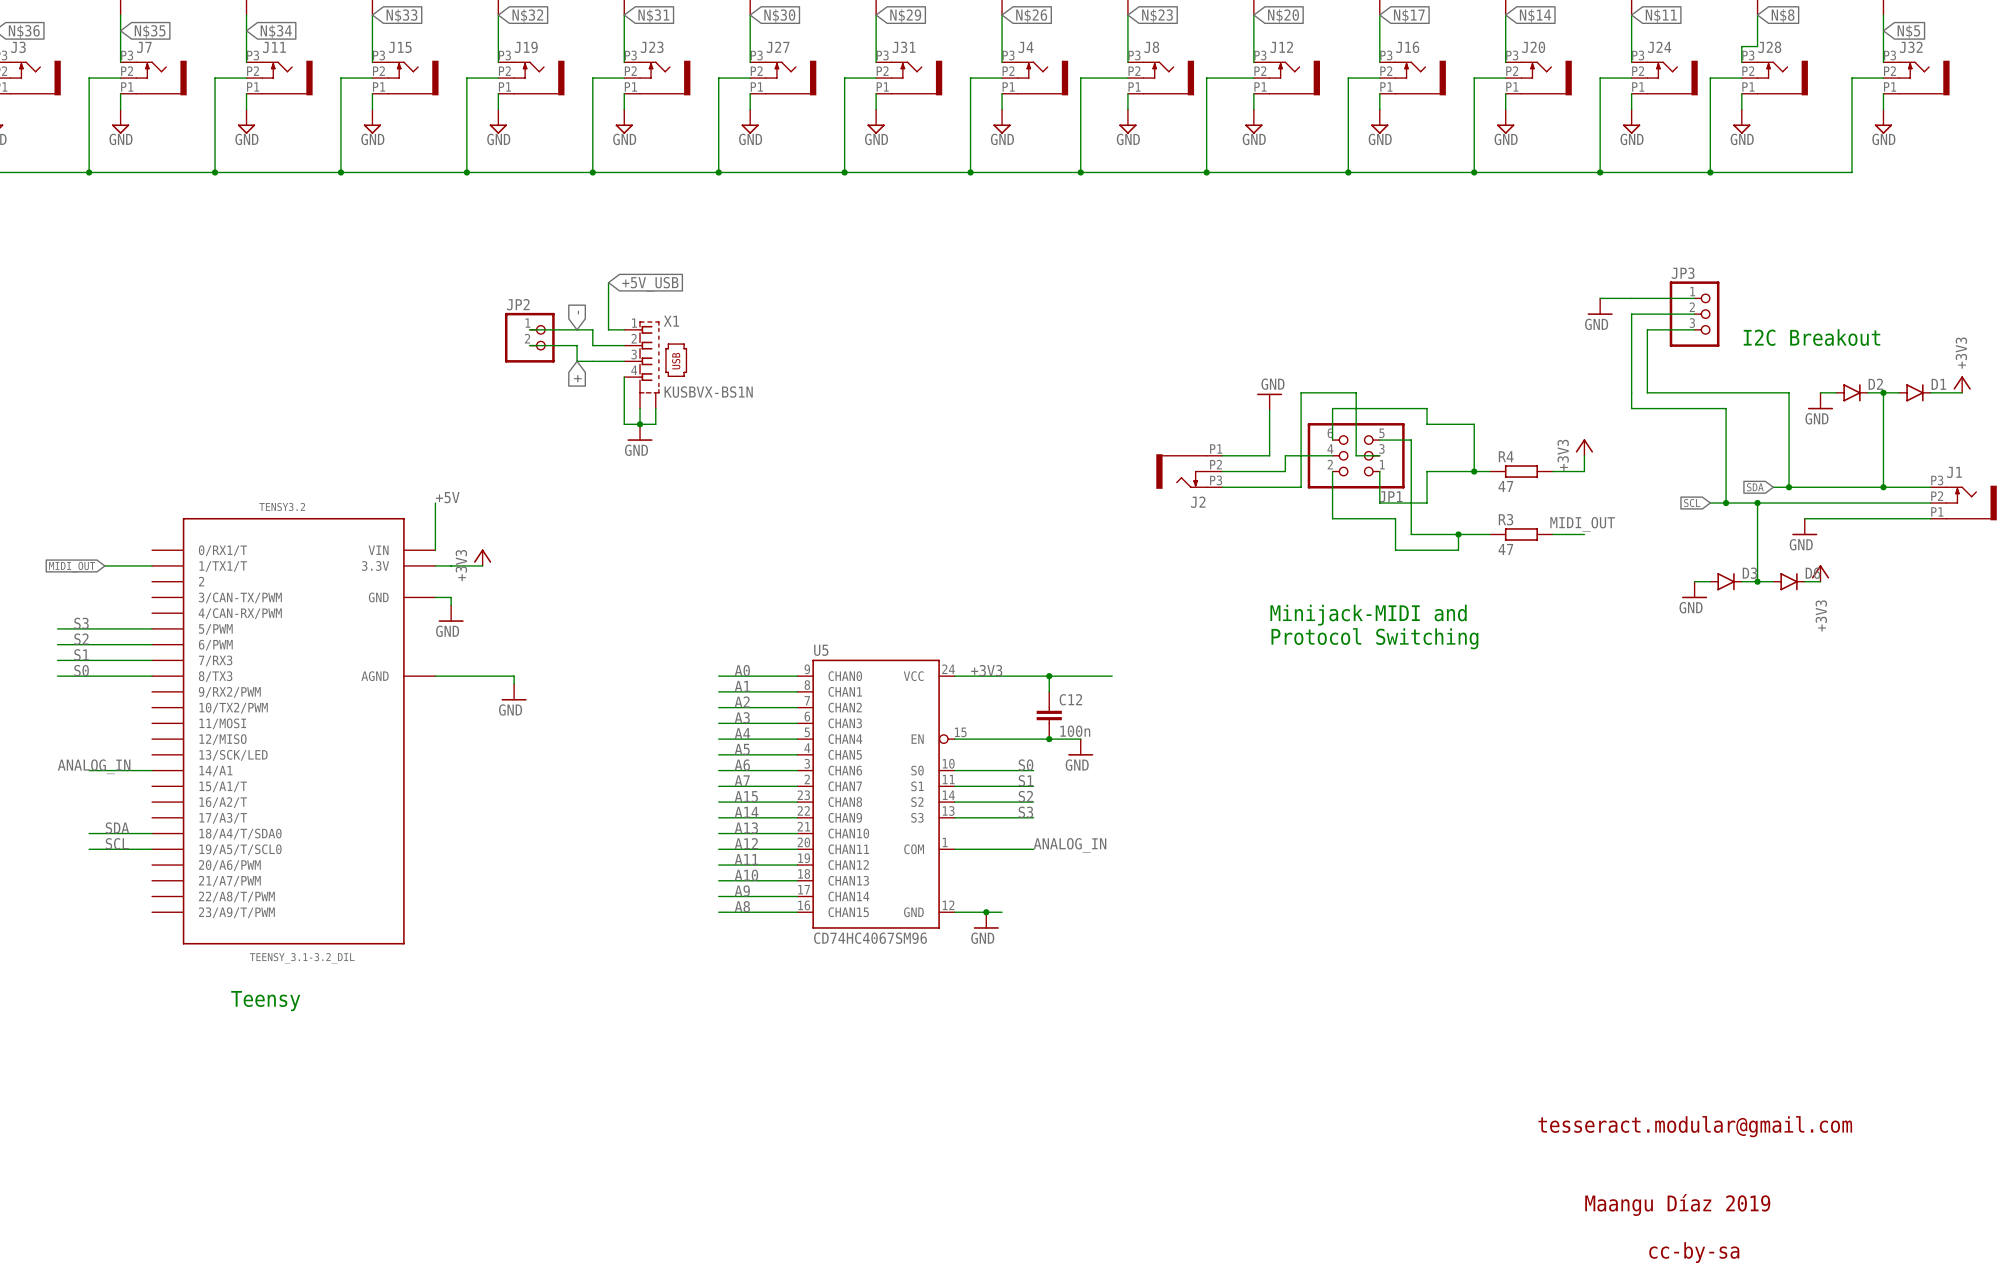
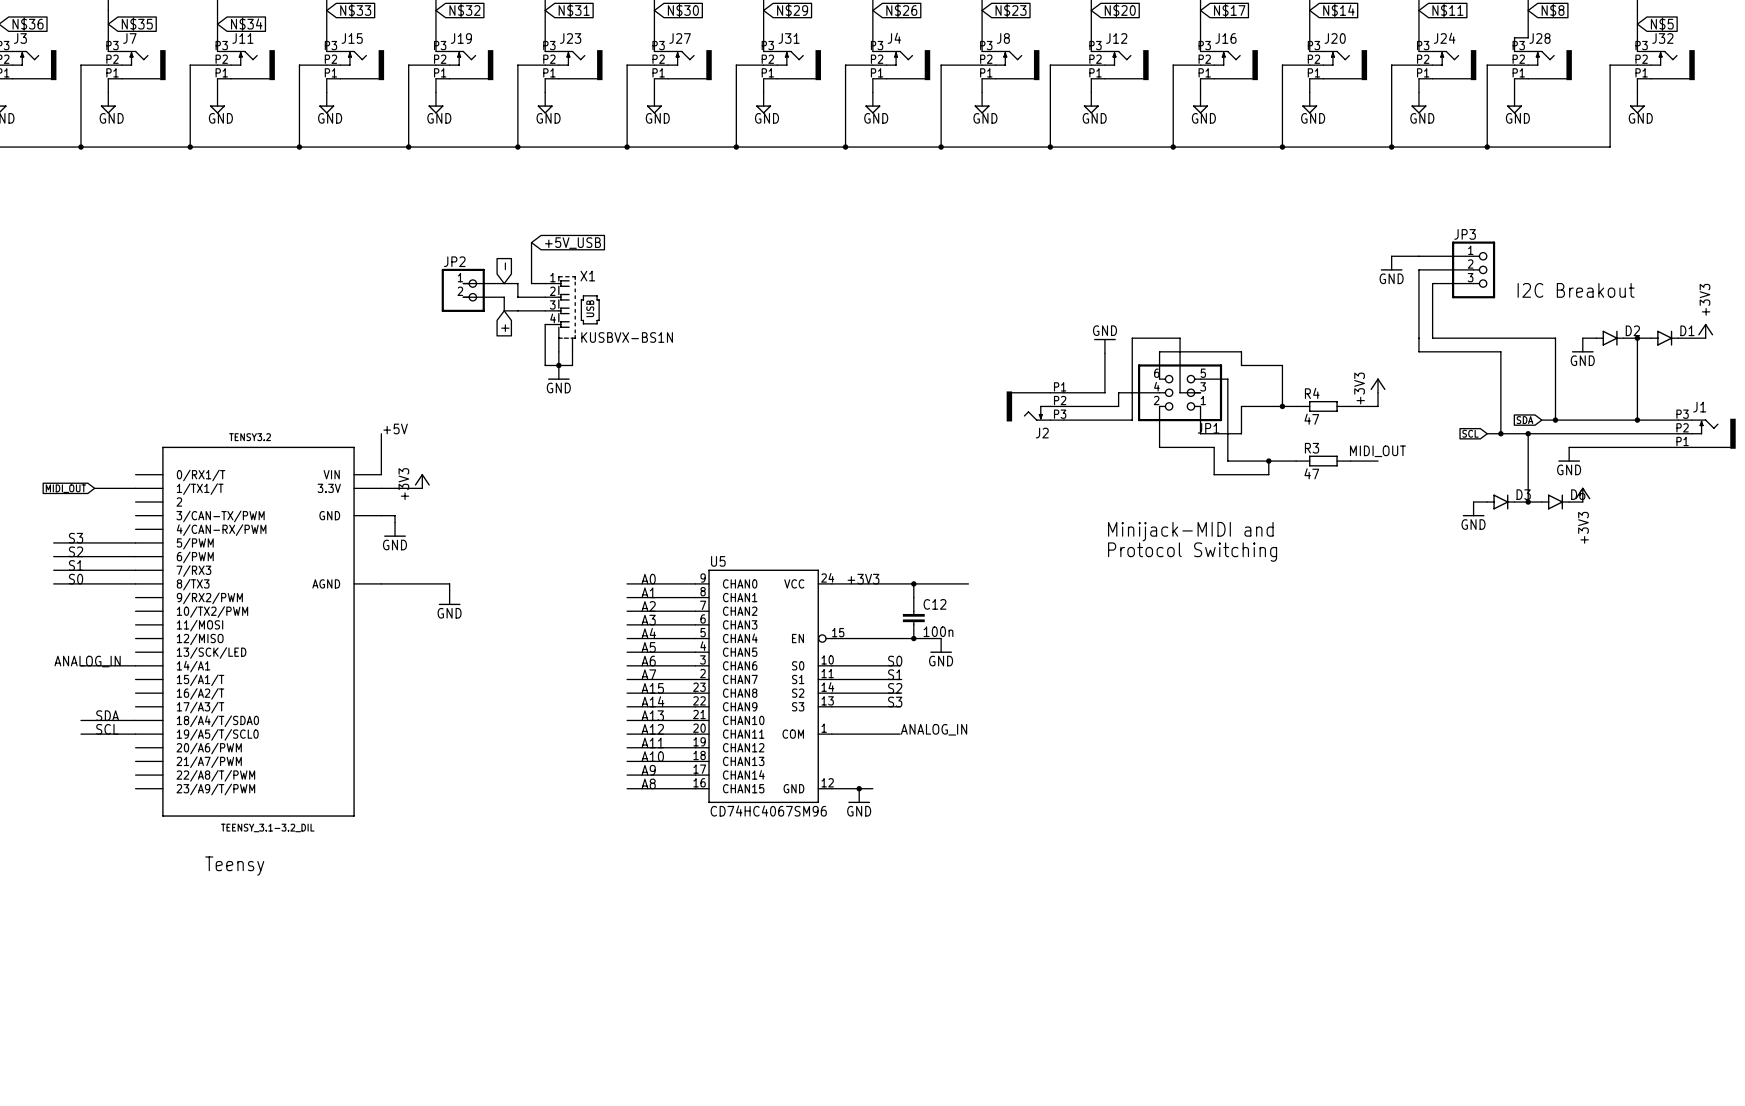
text: tesseract.modular@gmail.com (1695, 1126) -> none
text: Maangu Díaz 2019 (1677, 1204) -> none
text: cc-by-sa (1694, 1252) -> none

